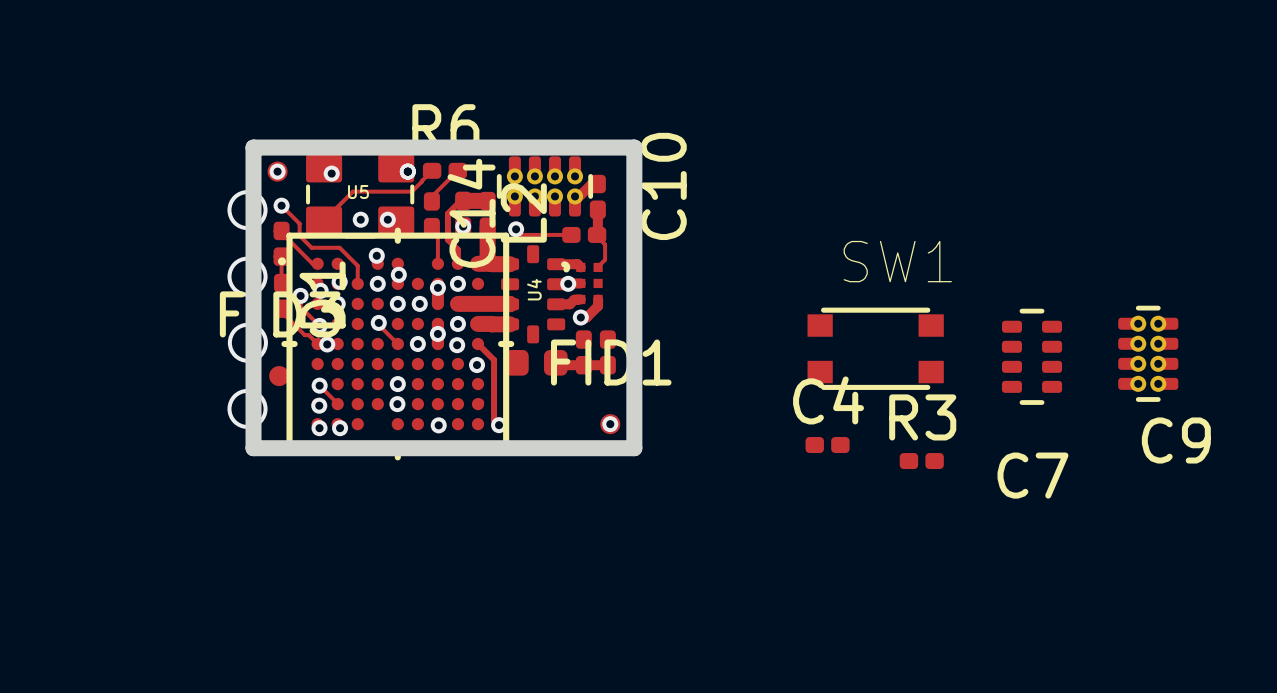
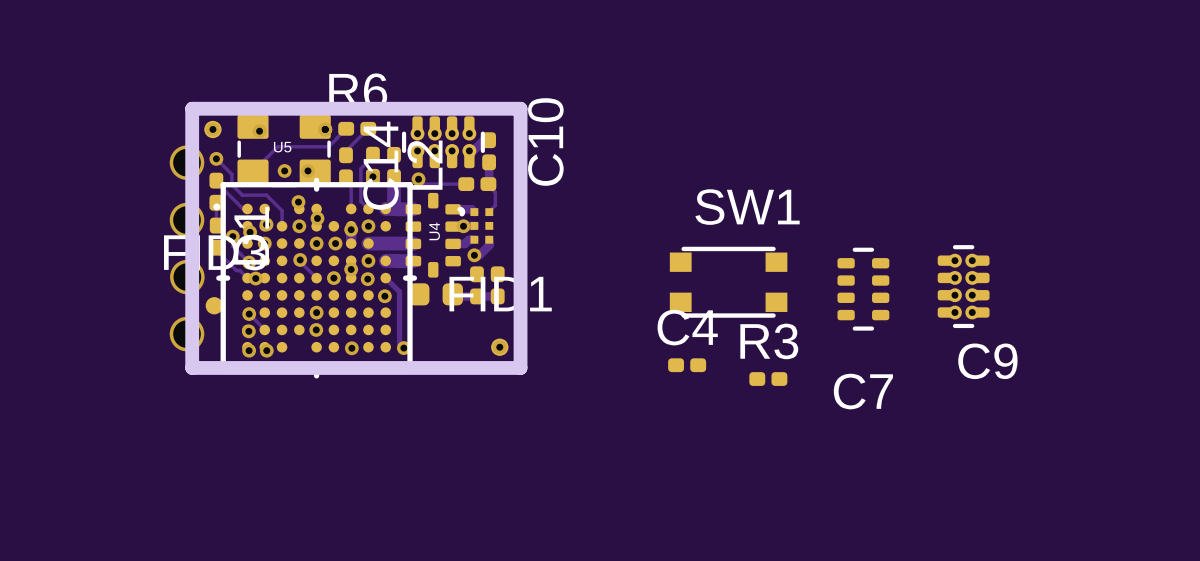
track: (487, 200) (460, 200) (447, 213) (447, 239) (457, 249) (457, 263) -> (372, 156) (360, 168) (360, 201) (368, 208)

